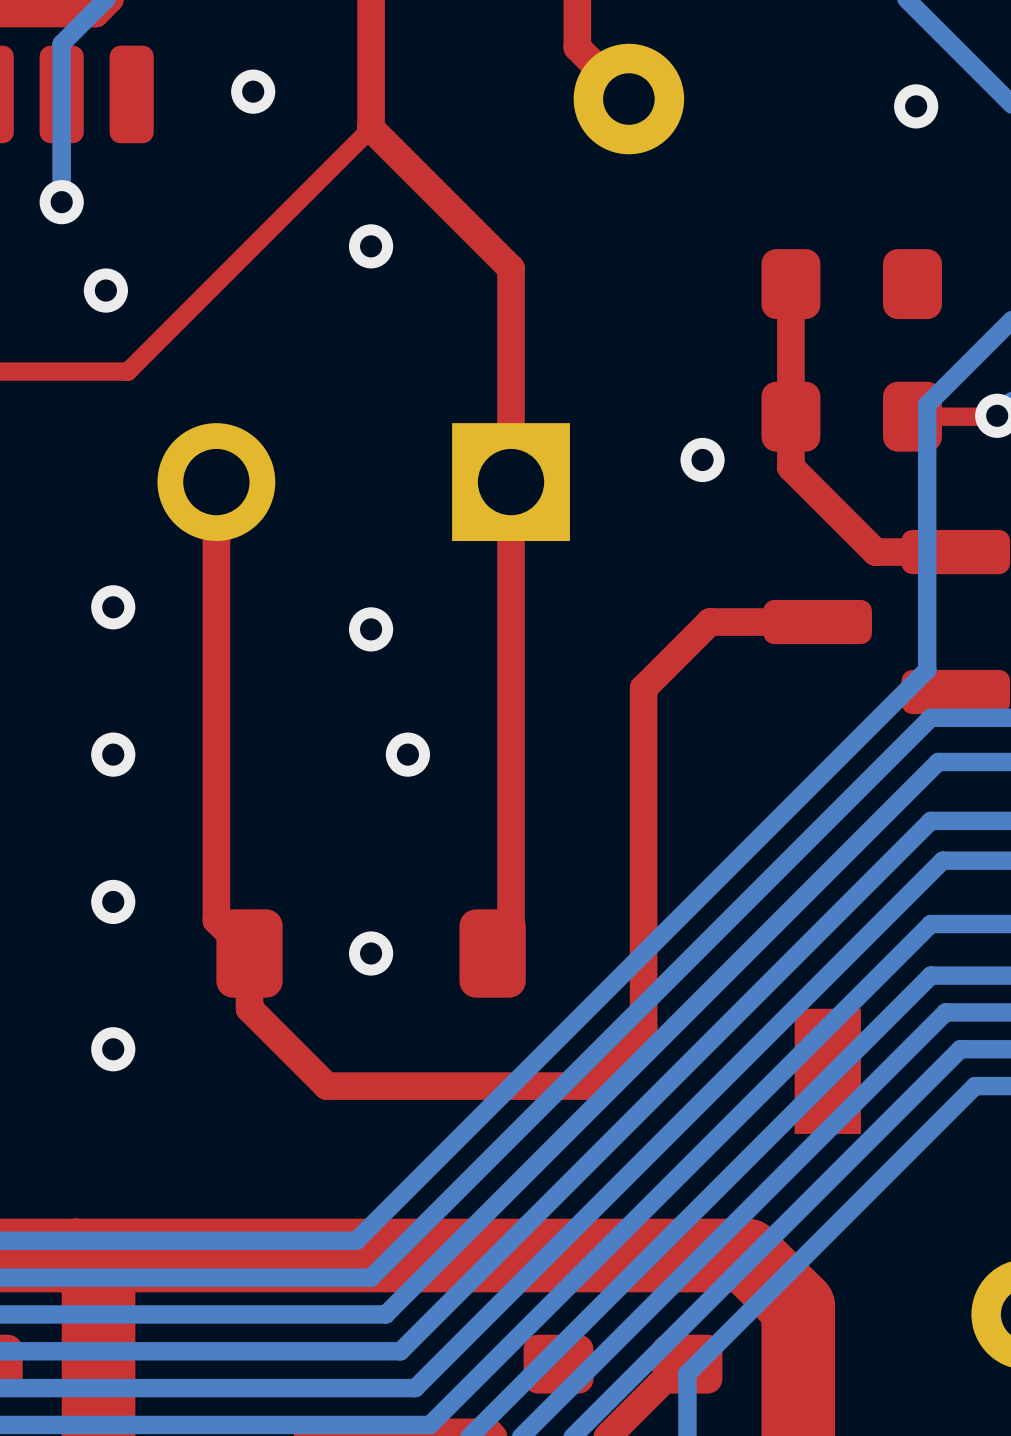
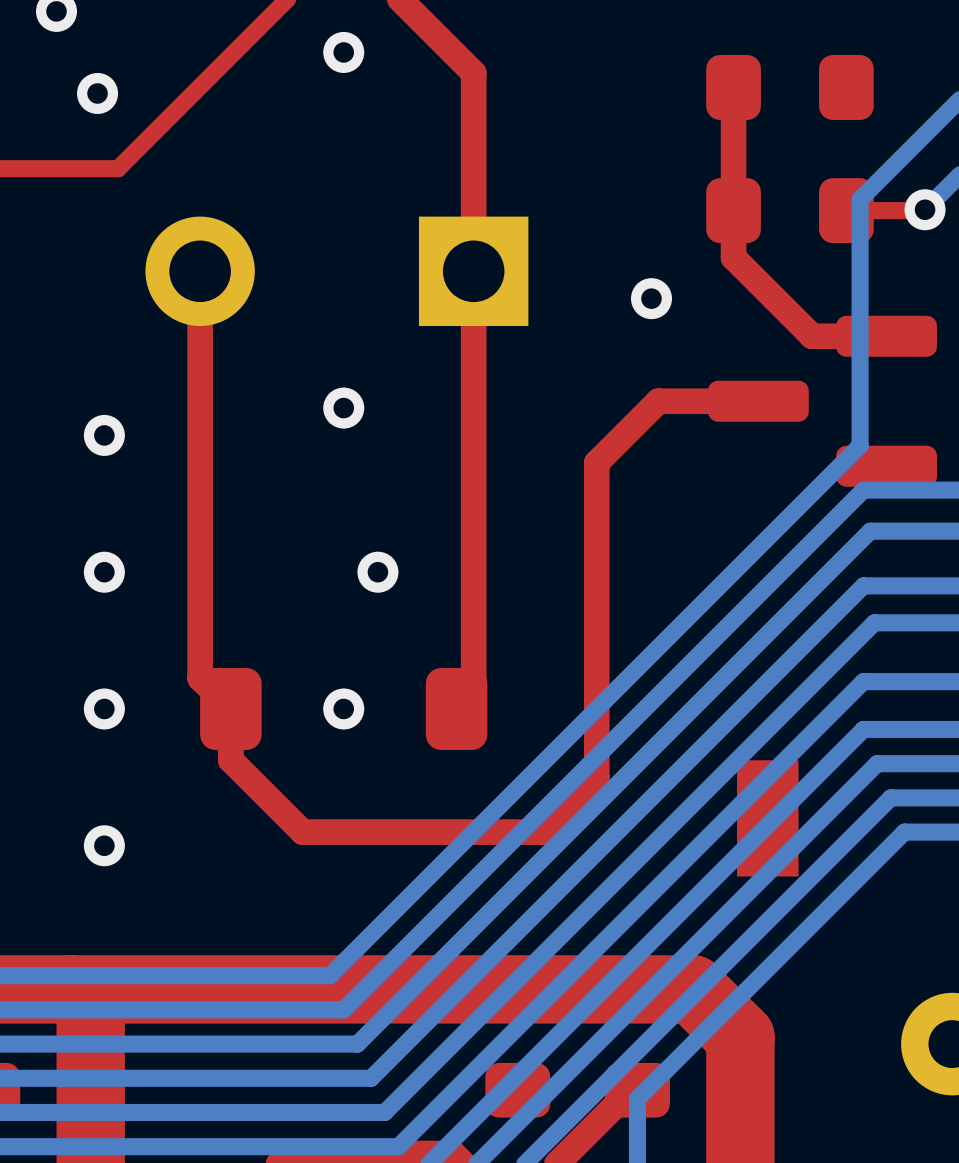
via position: (702, 459) -> (651, 298)
via: (113, 607) -> none
via: none -> (104, 435)
via: (113, 754) -> none
via position: (407, 754) -> (377, 572)
via: none -> (104, 572)
via: (113, 901) -> none
via: none -> (104, 708)
via: (113, 1049) -> none
via: none -> (104, 845)

